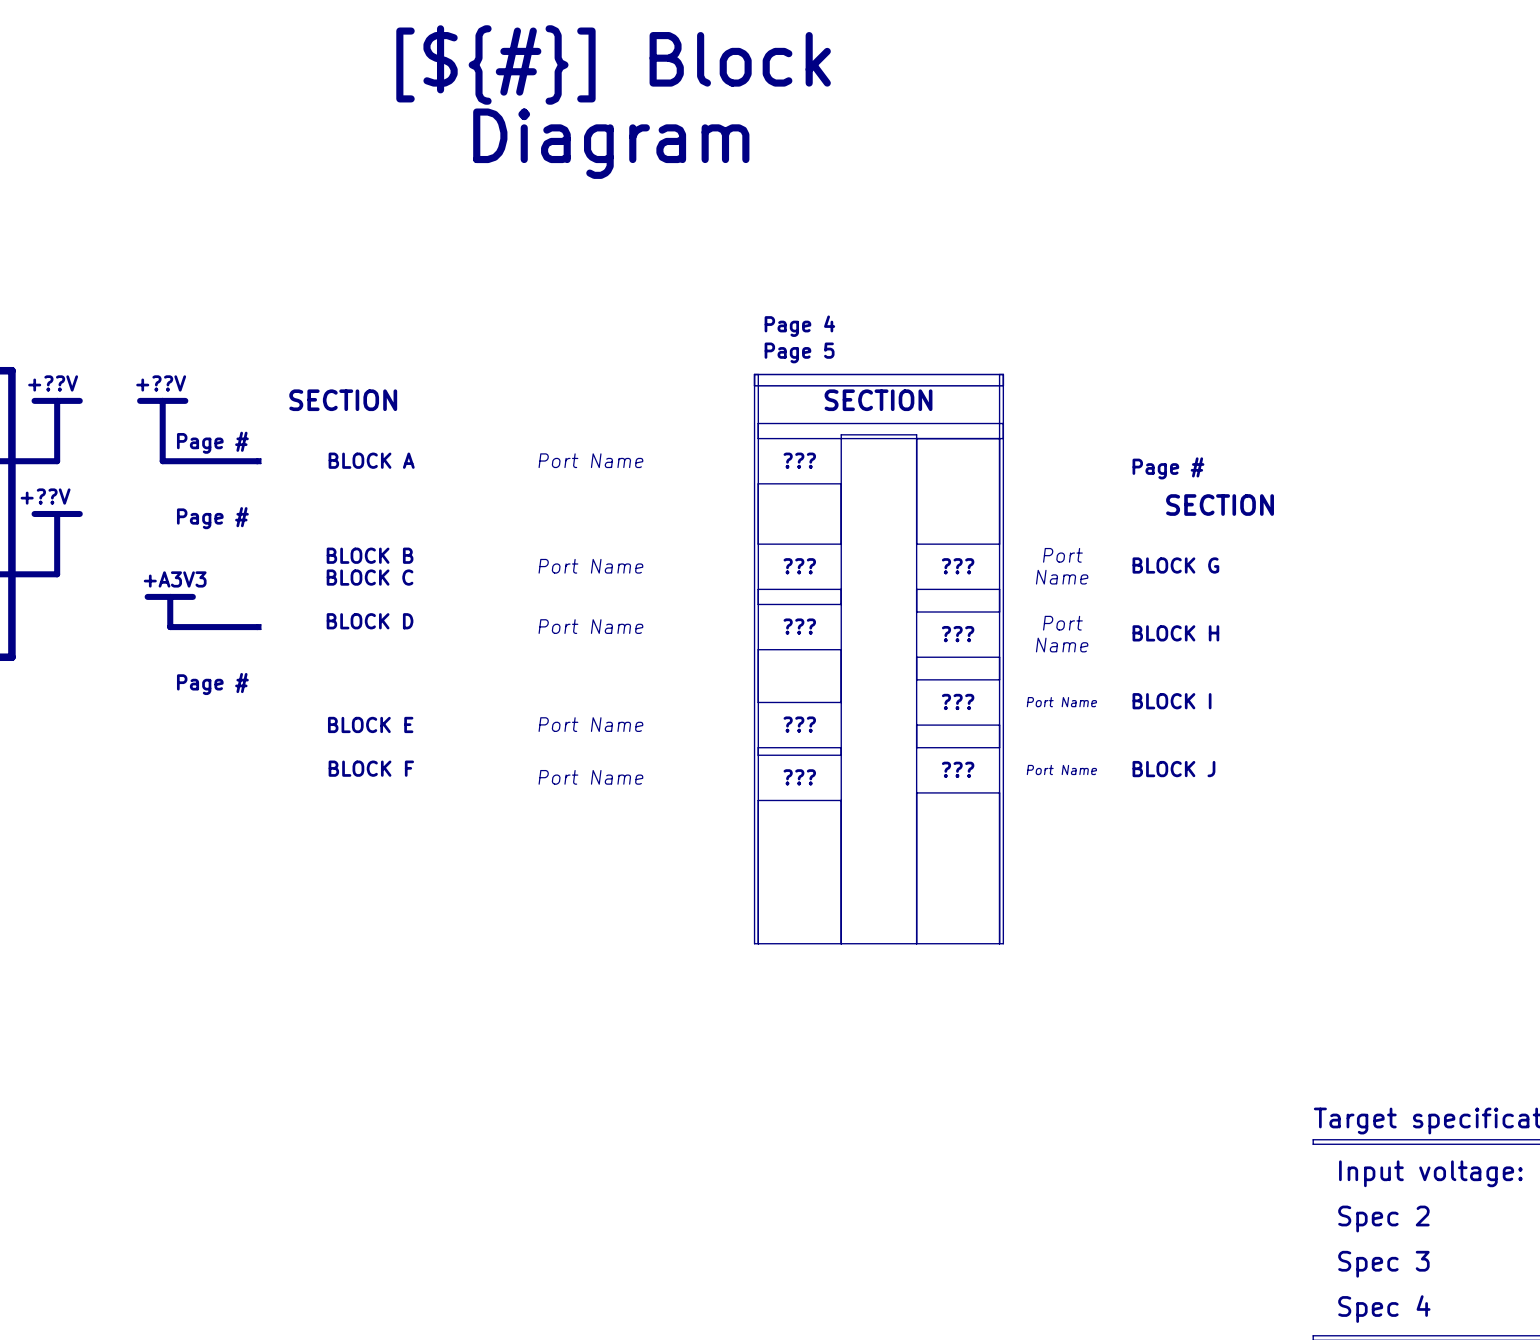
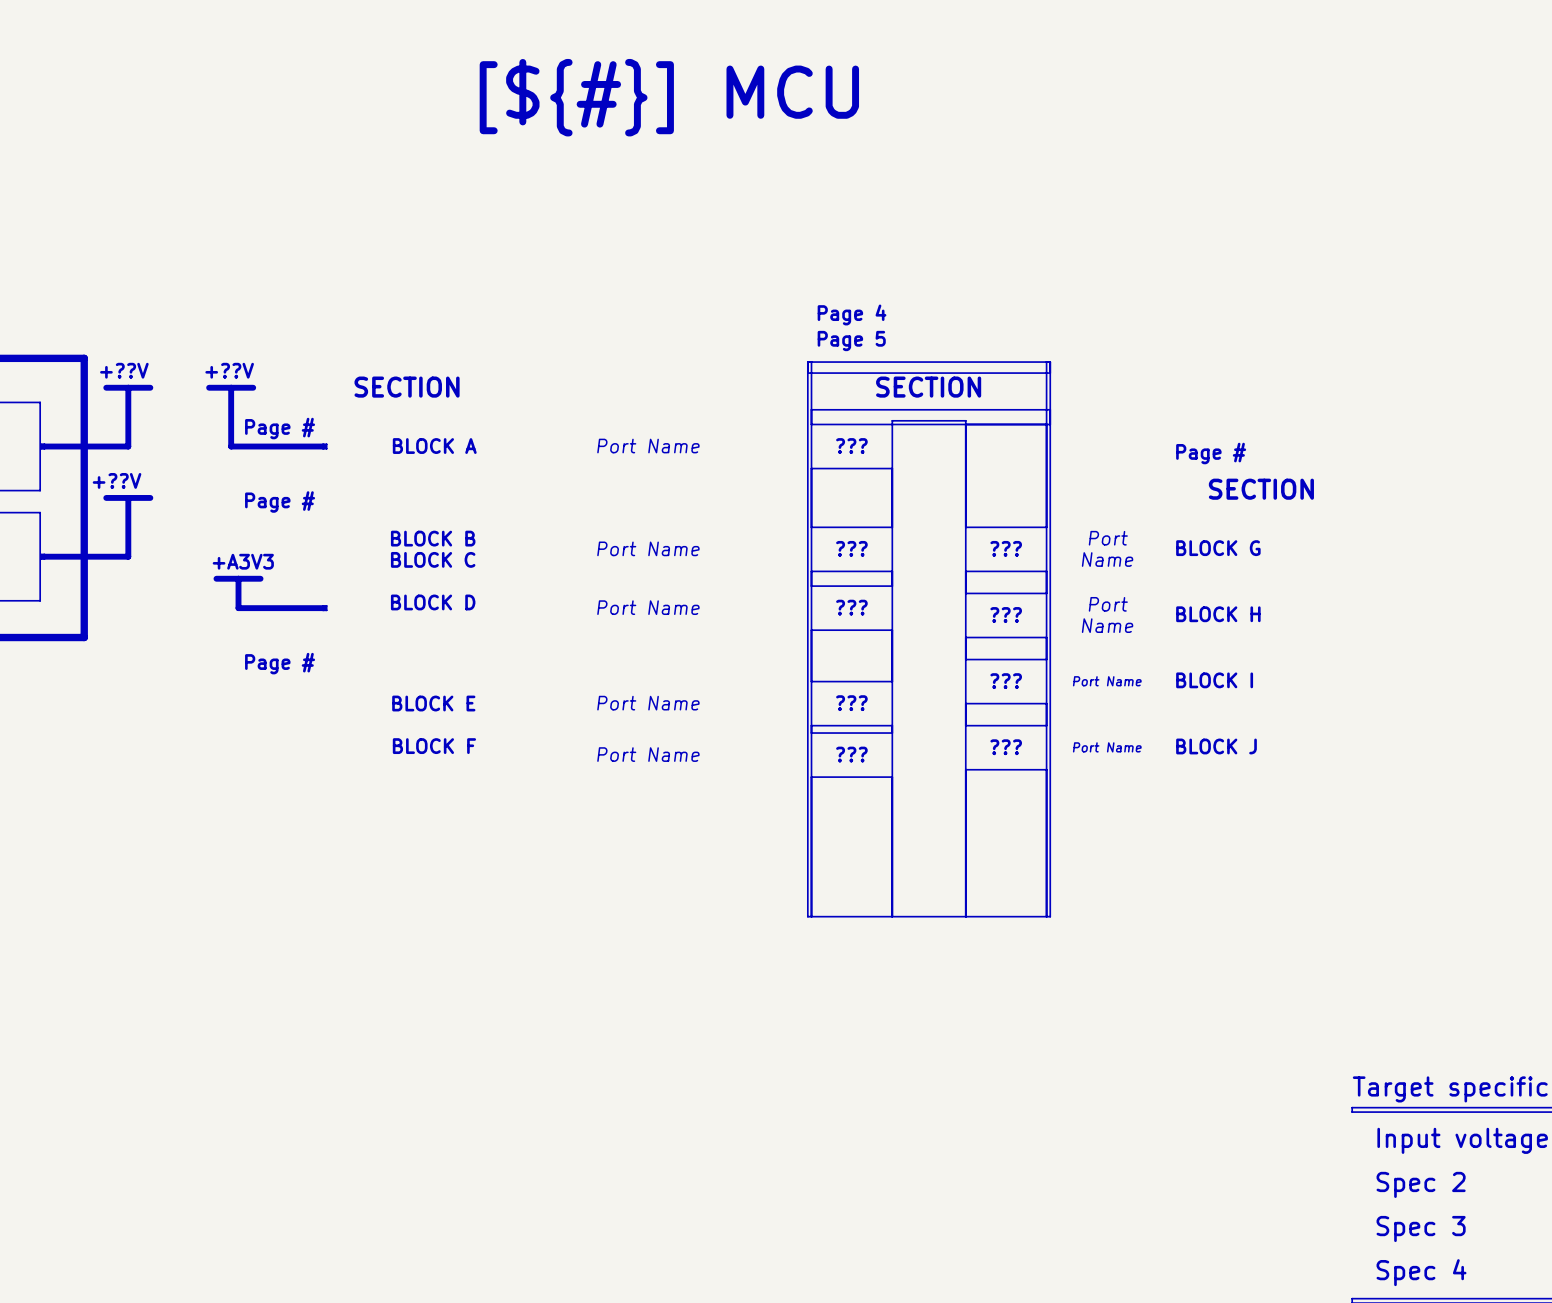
text: [${#}] Block (613, 64) -> [${#}] MCU (669, 97)
text: Diagram (611, 143) -> none

